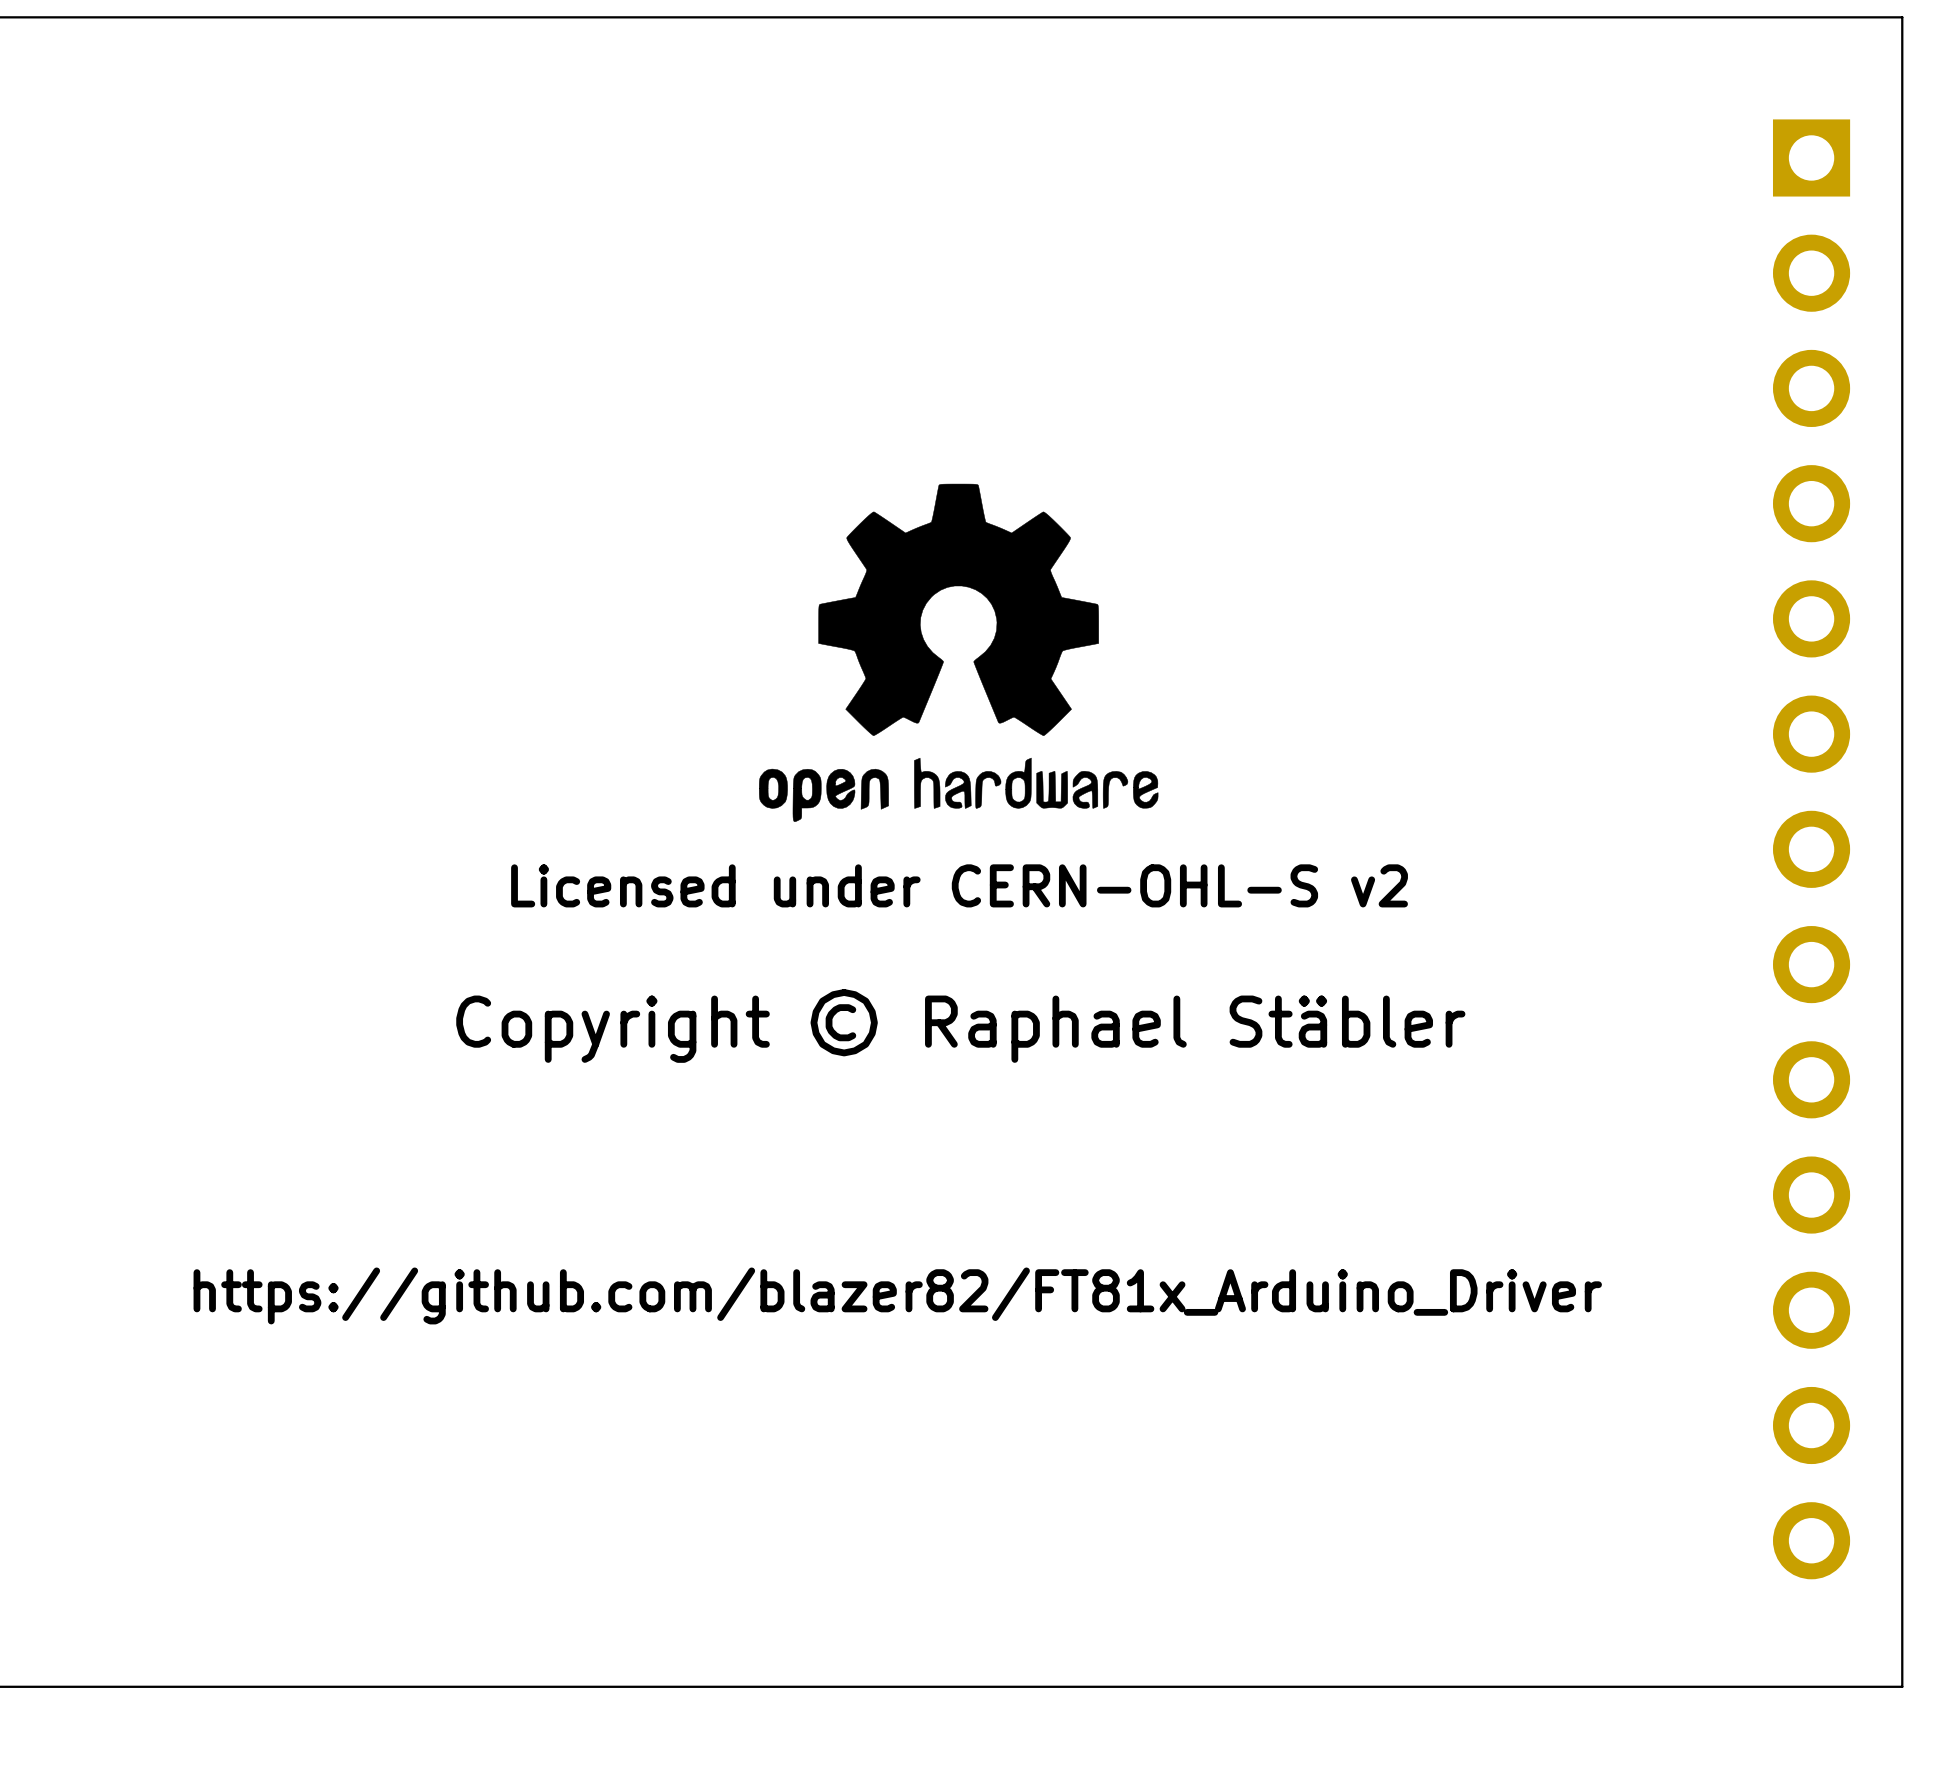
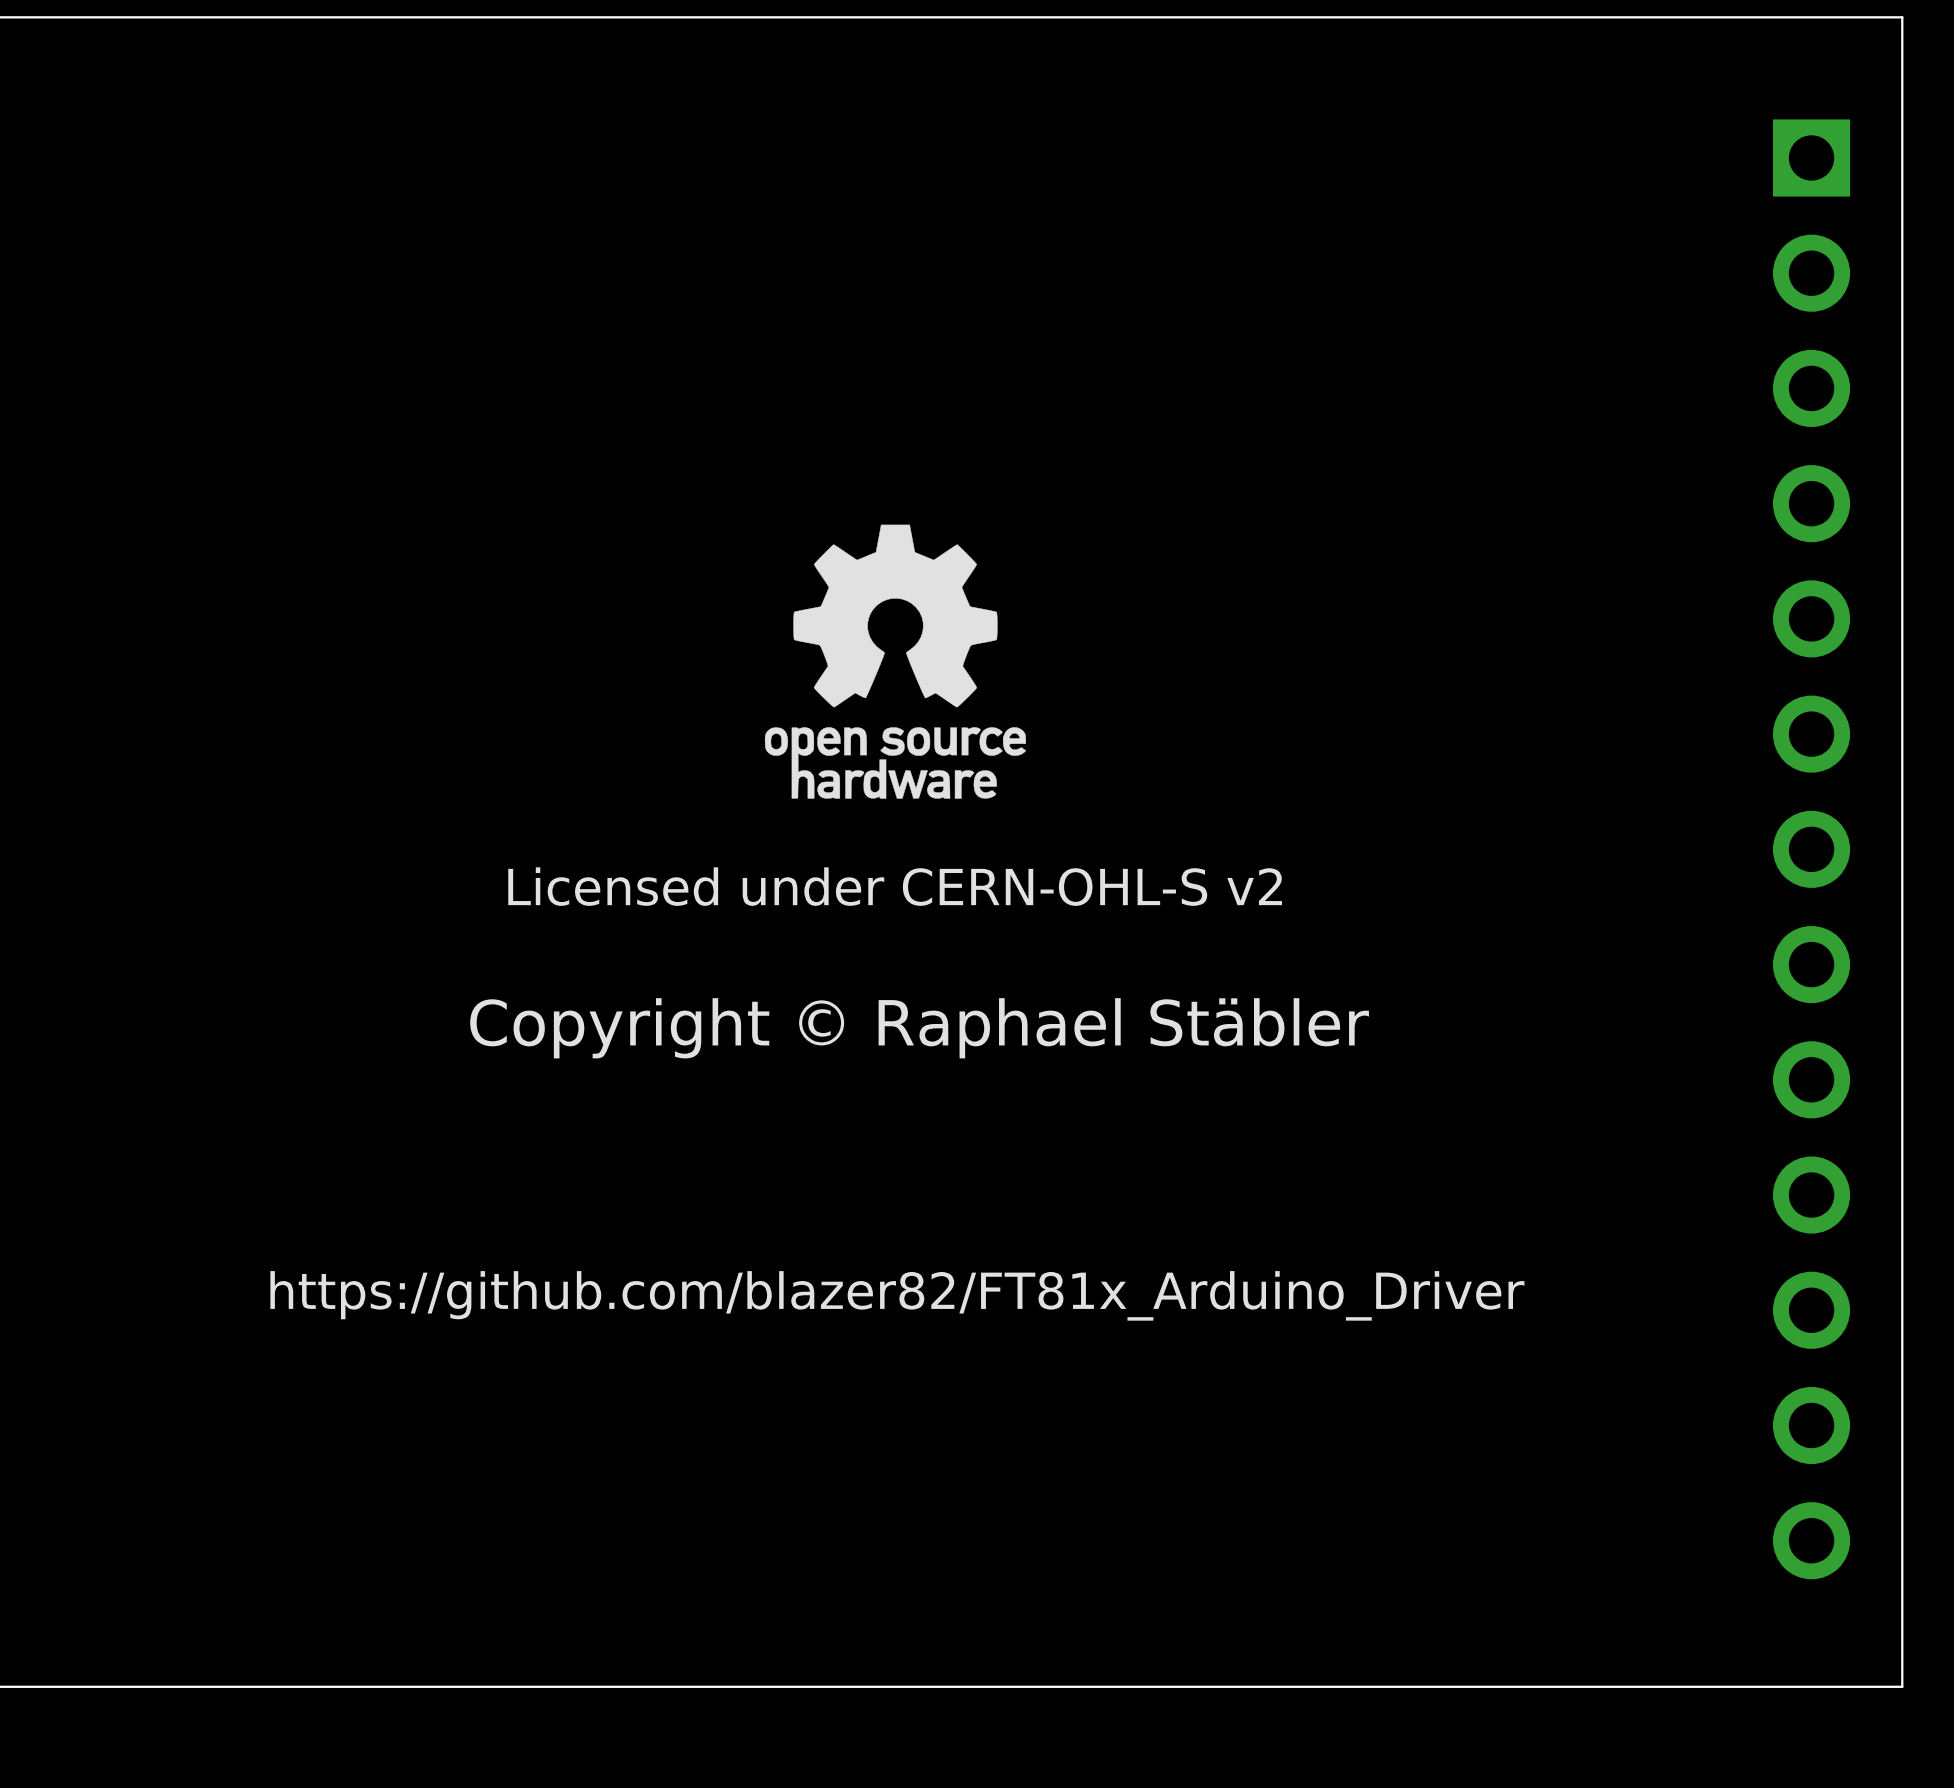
drawing: [759, 483, 1159, 822] -> none
drawing: none -> [764, 524, 1027, 799]
text position: Licensed under CERN-OHL-S v2 (959, 885) -> Licensed under CERN-OHL-S v2 (895, 886)
text position: Copyright © Raphael Stäbler (960, 1025) -> Copyright © Raphael Stäbler (919, 1028)

